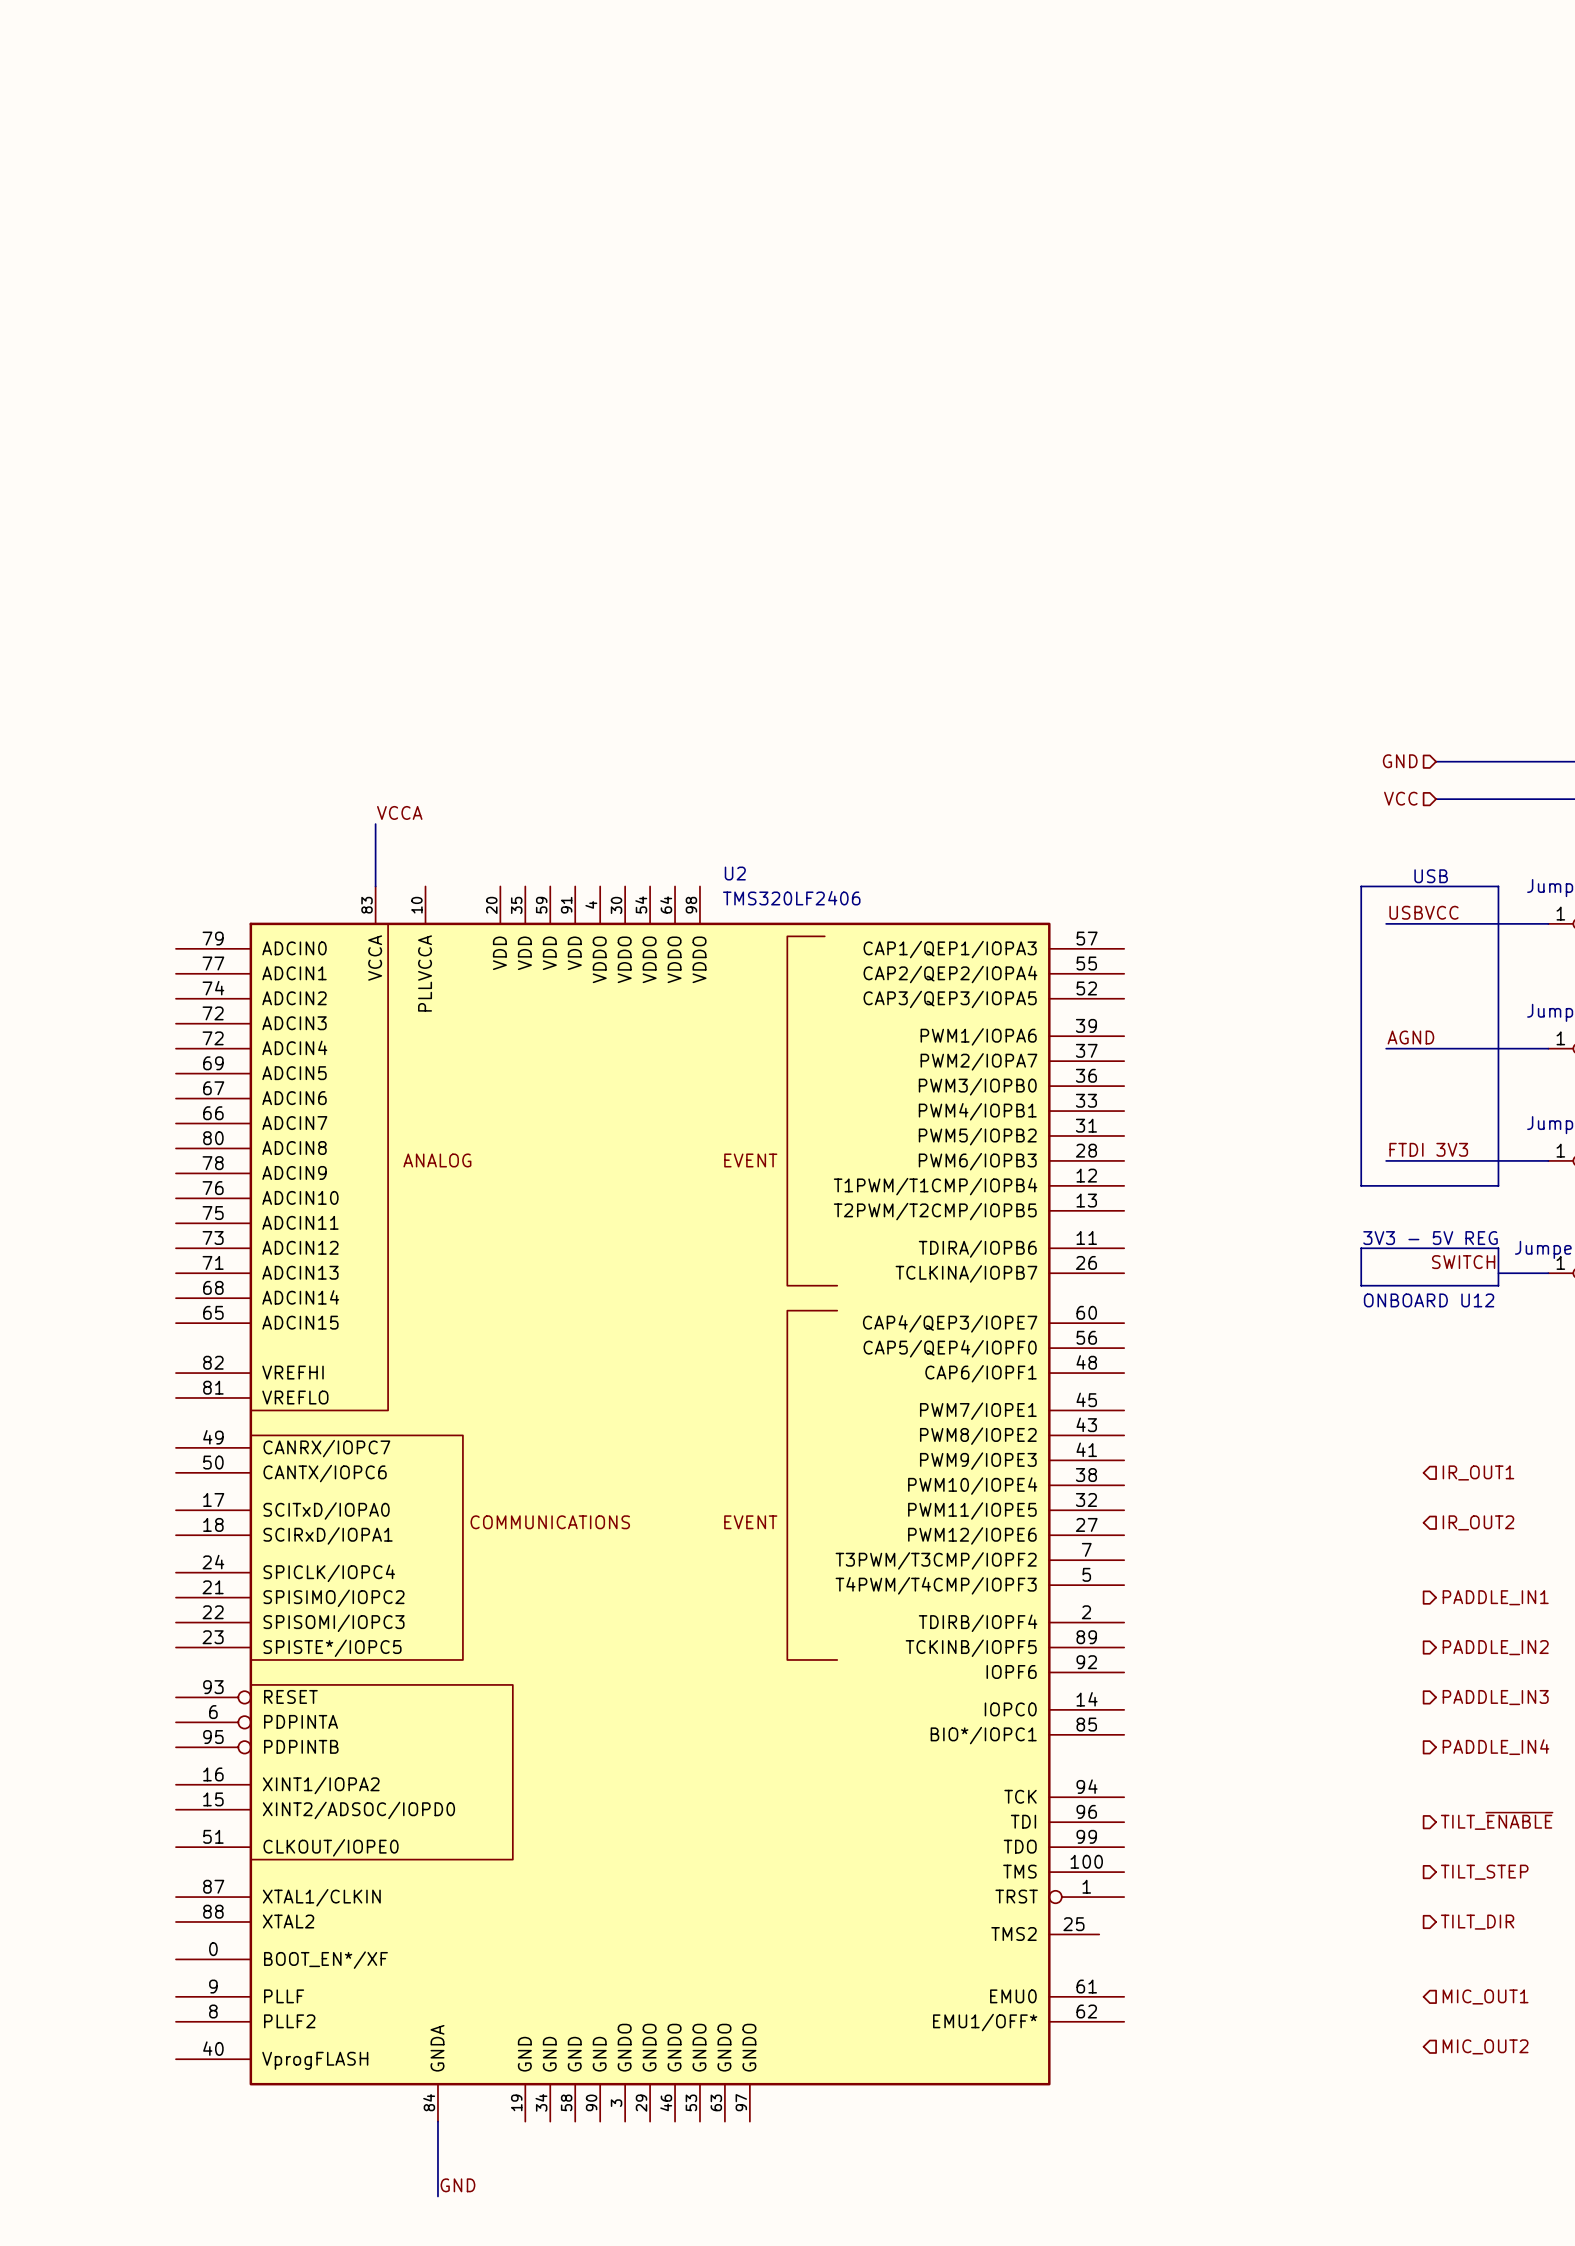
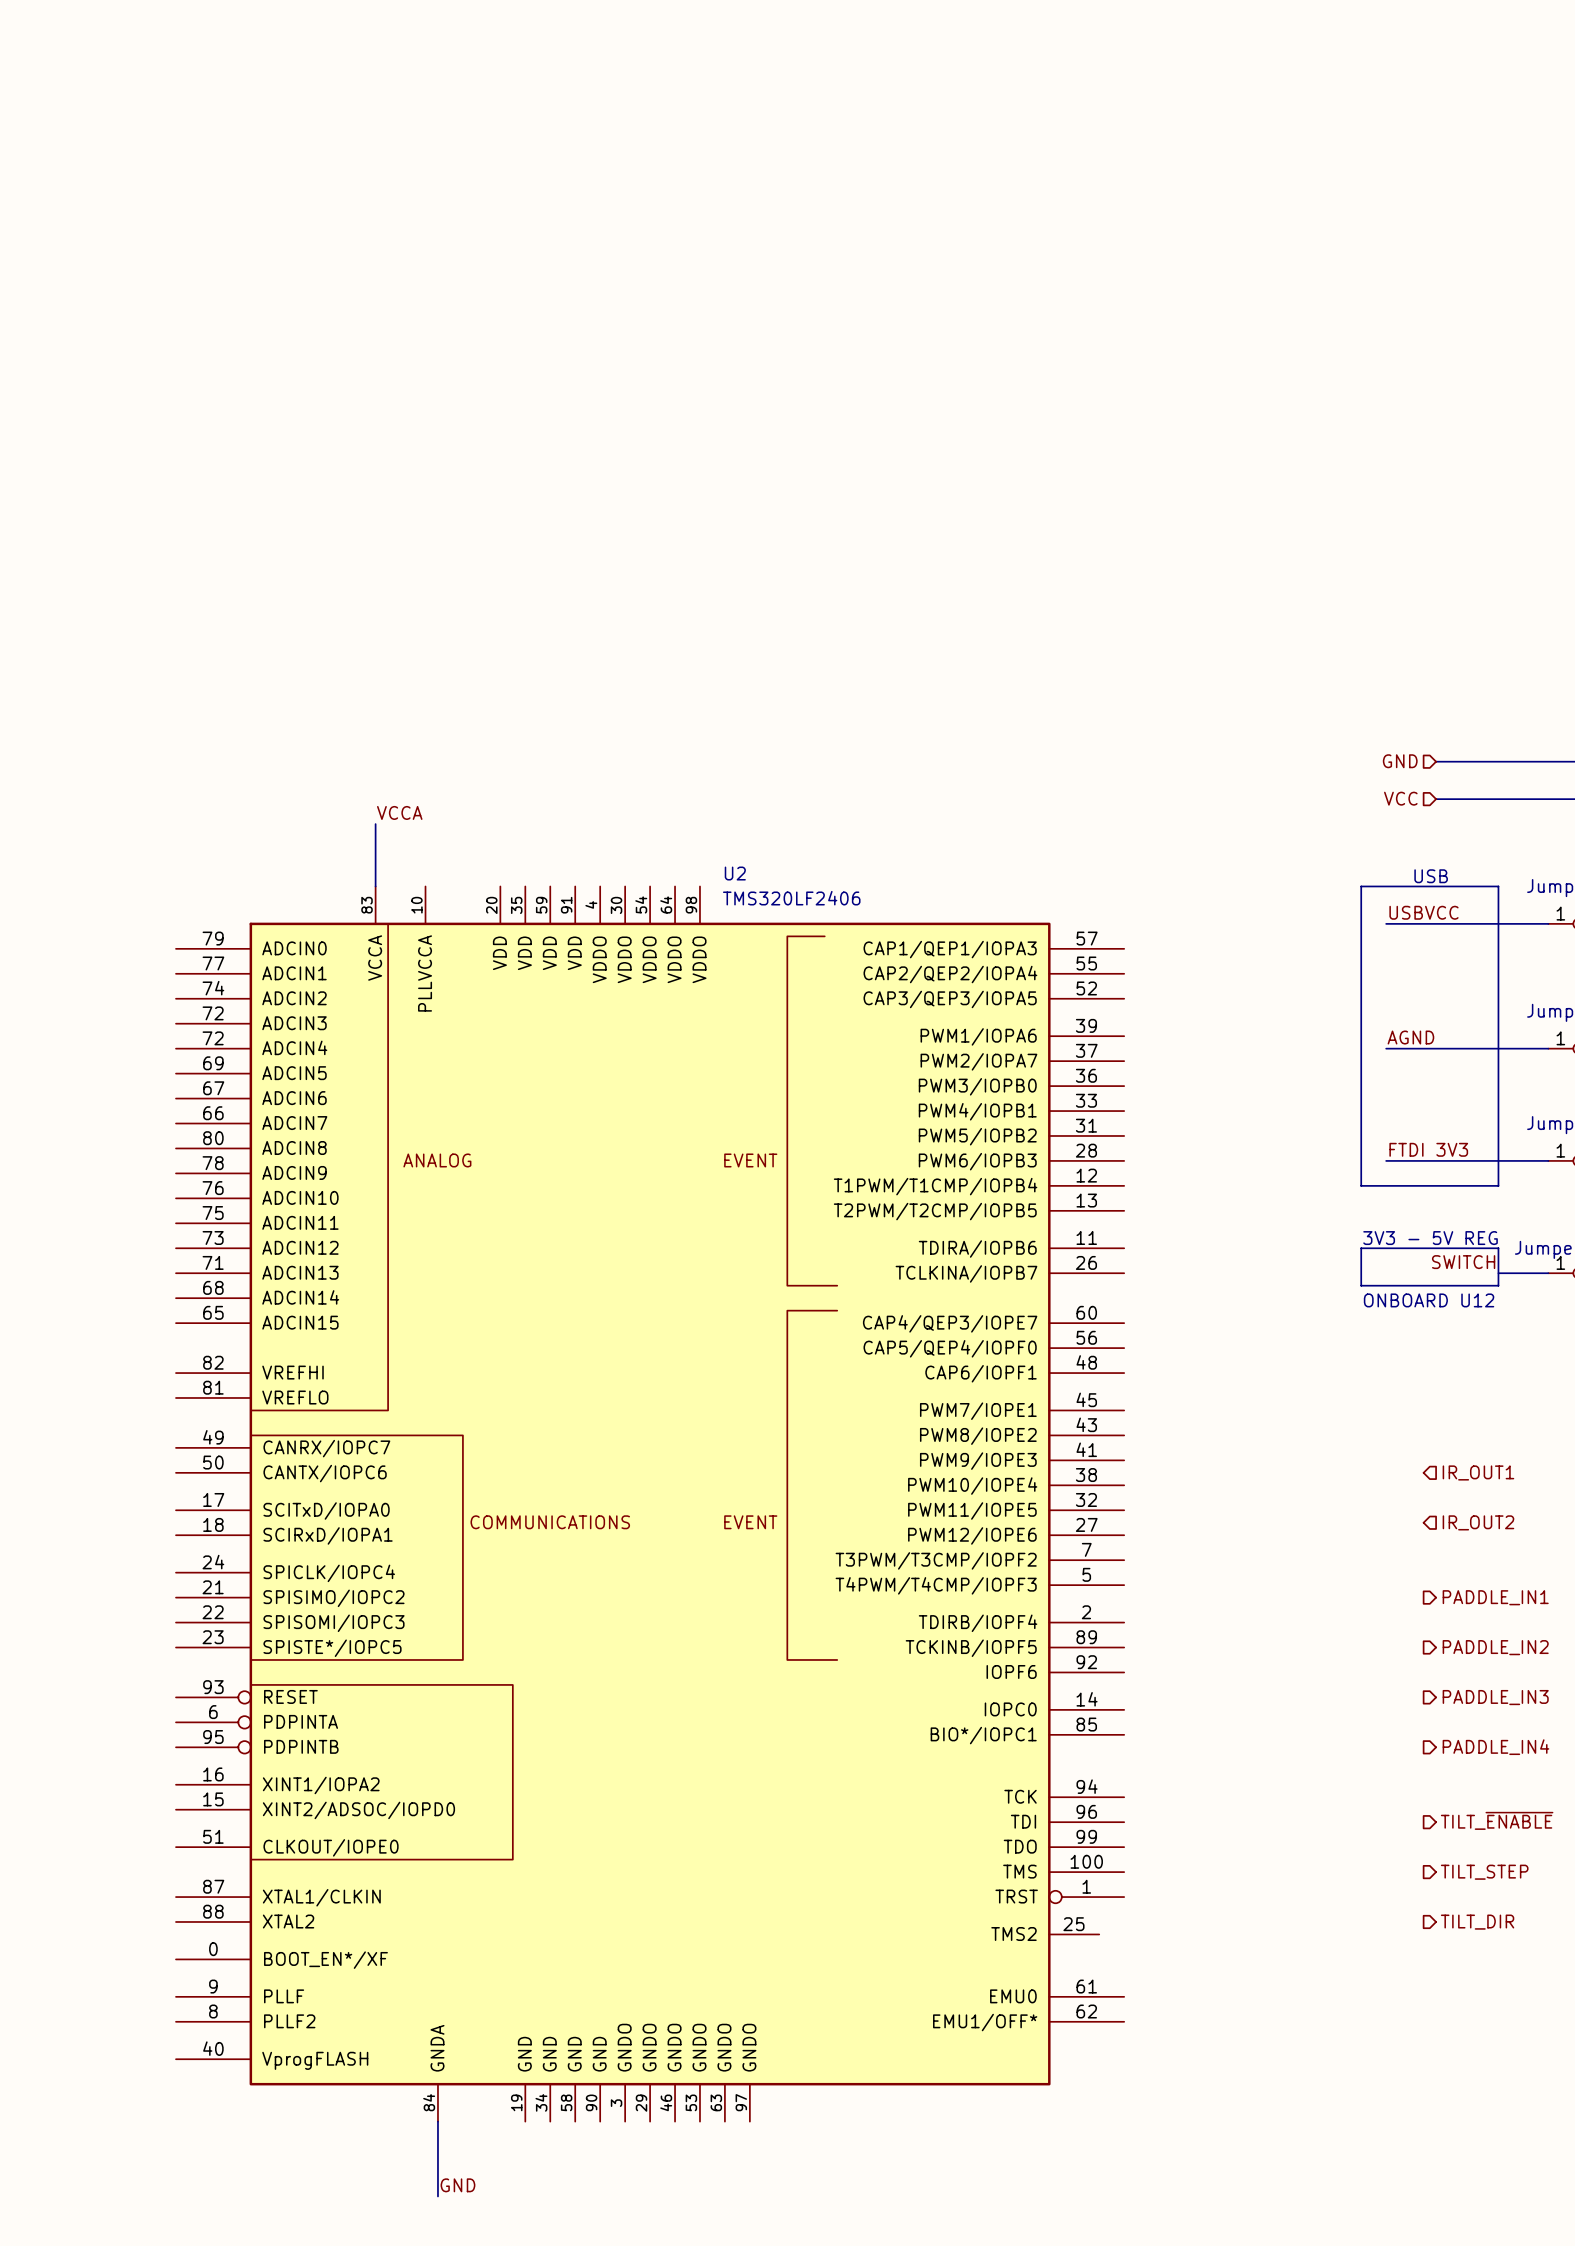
hierarchical label: MIC_OUT1 (1485, 1996) -> none
hierarchical label: MIC_OUT2 (1485, 2046) -> none

